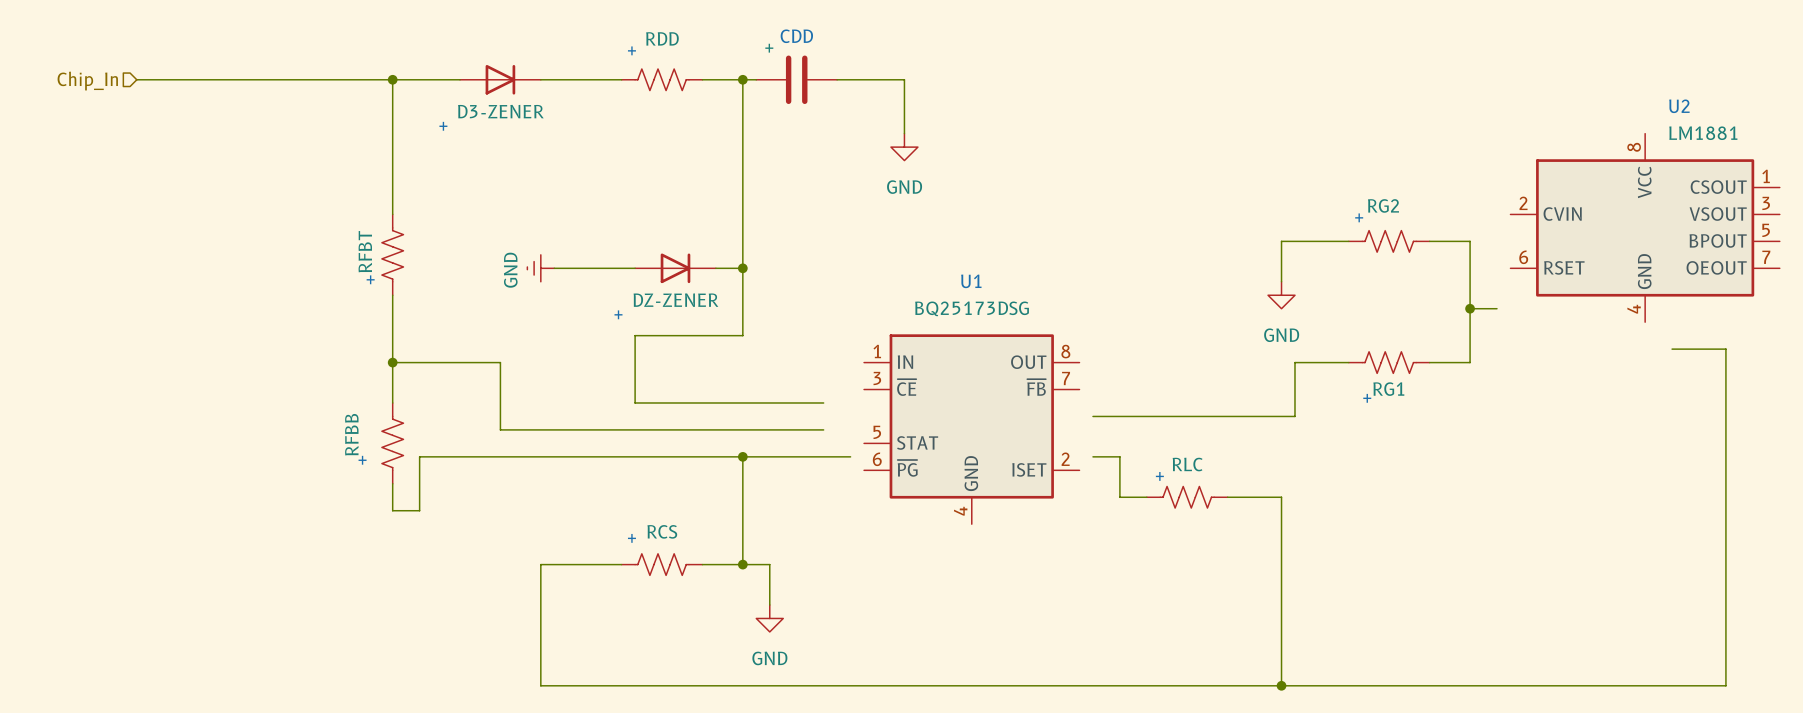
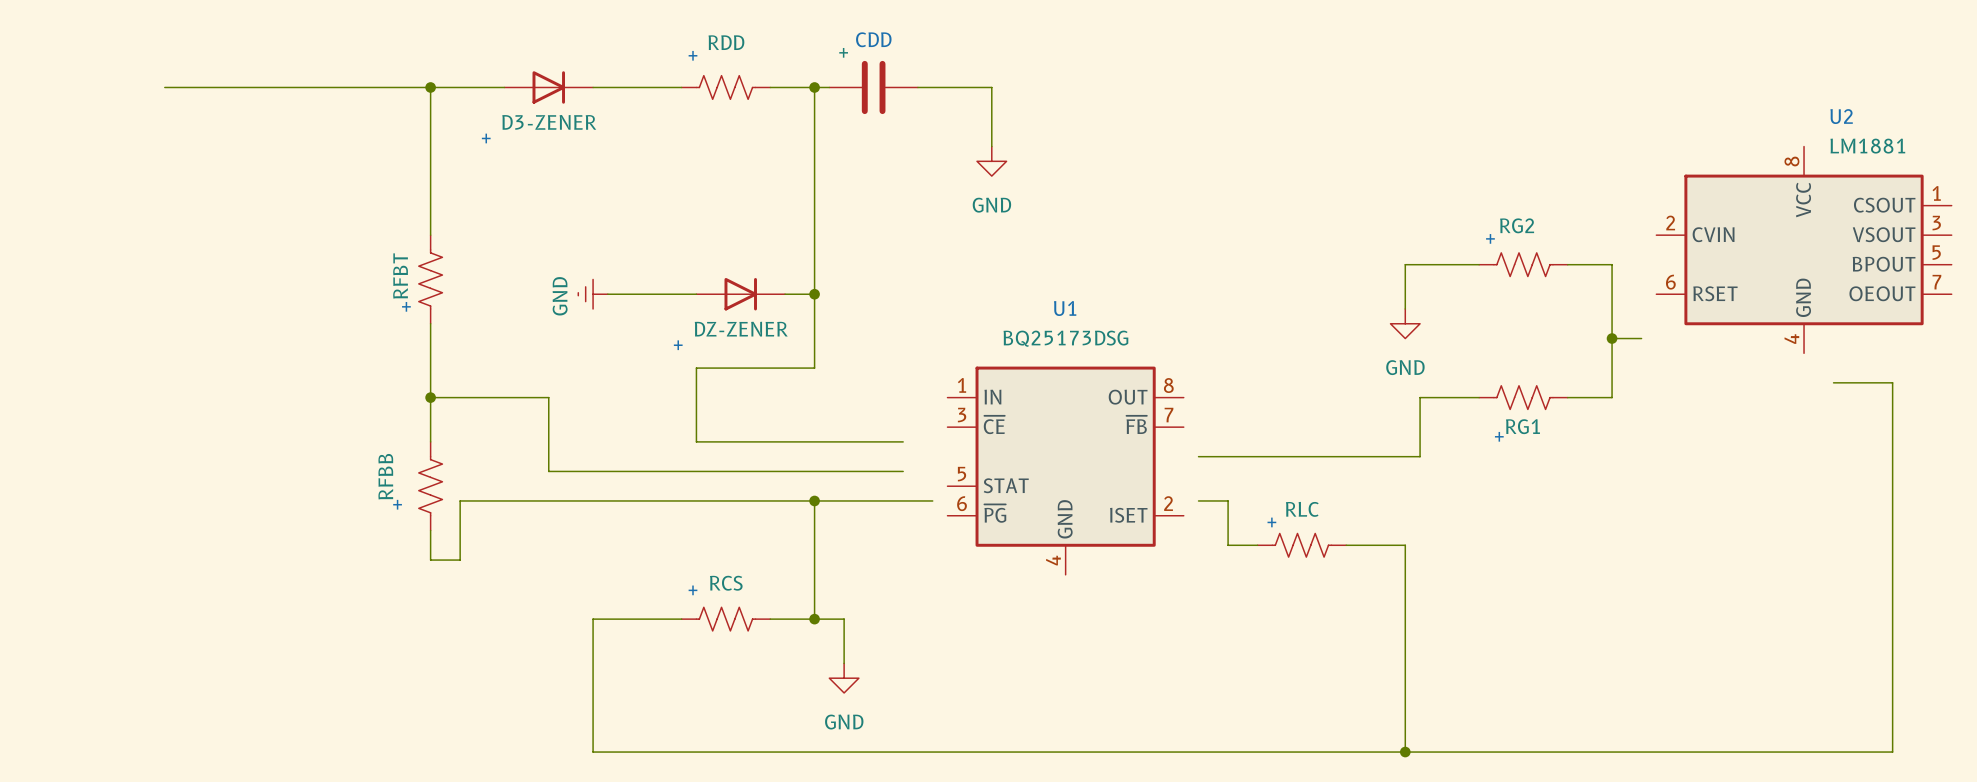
wire: (136, 79) (150, 79) -> none
hierarchical label: Chip_In (87, 81) -> none

